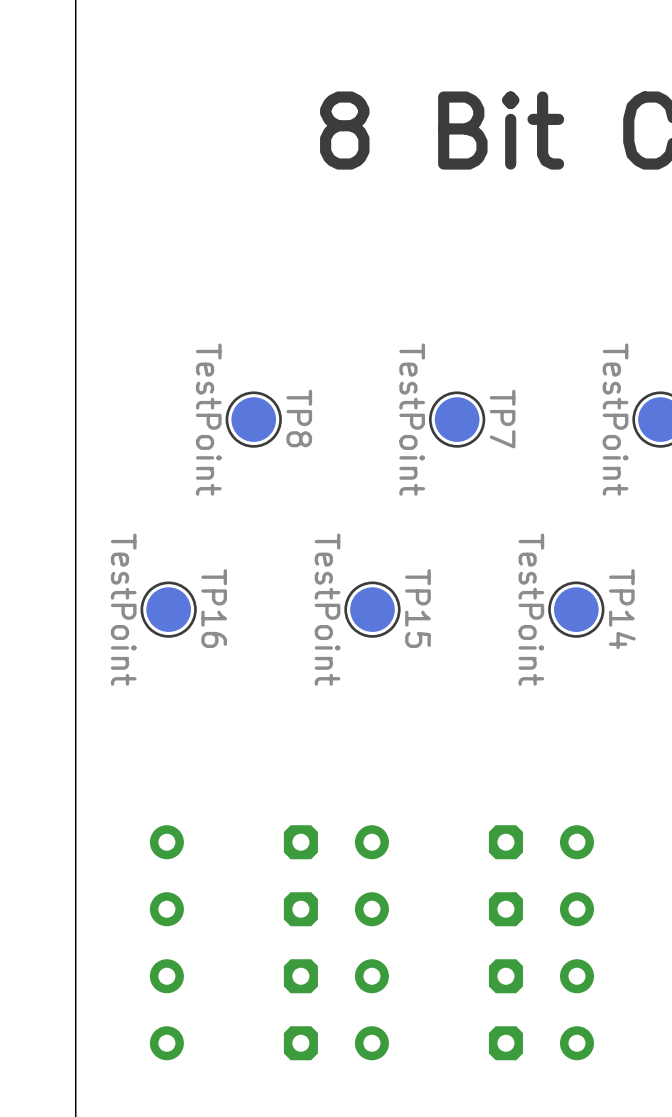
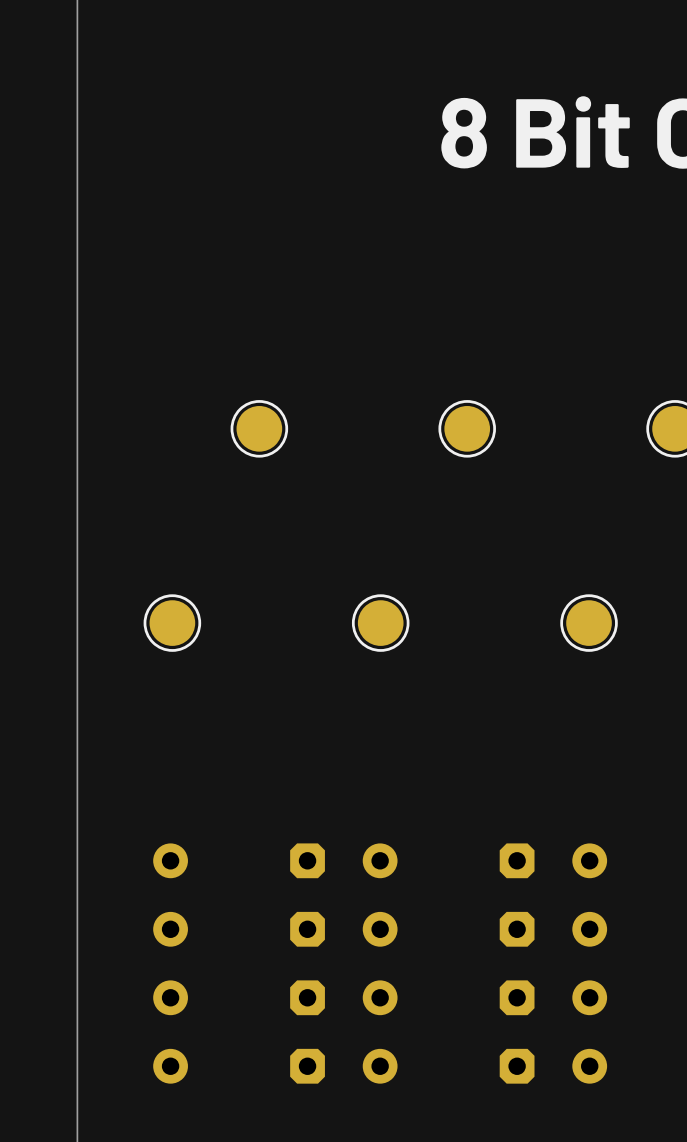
TP8 name: TP8 (299, 418) -> none
TP8 value: TestPoint (208, 419) -> none
TP7 value: TestPoint (412, 419) -> none
TP7 name: TP7 (502, 419) -> none
part value: TestPoint (615, 419) -> none
TP16 name: TP16 (214, 608) -> none
TP15 name: TP15 (417, 608) -> none
TP16 value: TestPoint (123, 609) -> none
TP15 value: TestPoint (327, 609) -> none
TP14 value: TestPoint (531, 609) -> none
TP14 name: TP14 (622, 609) -> none

